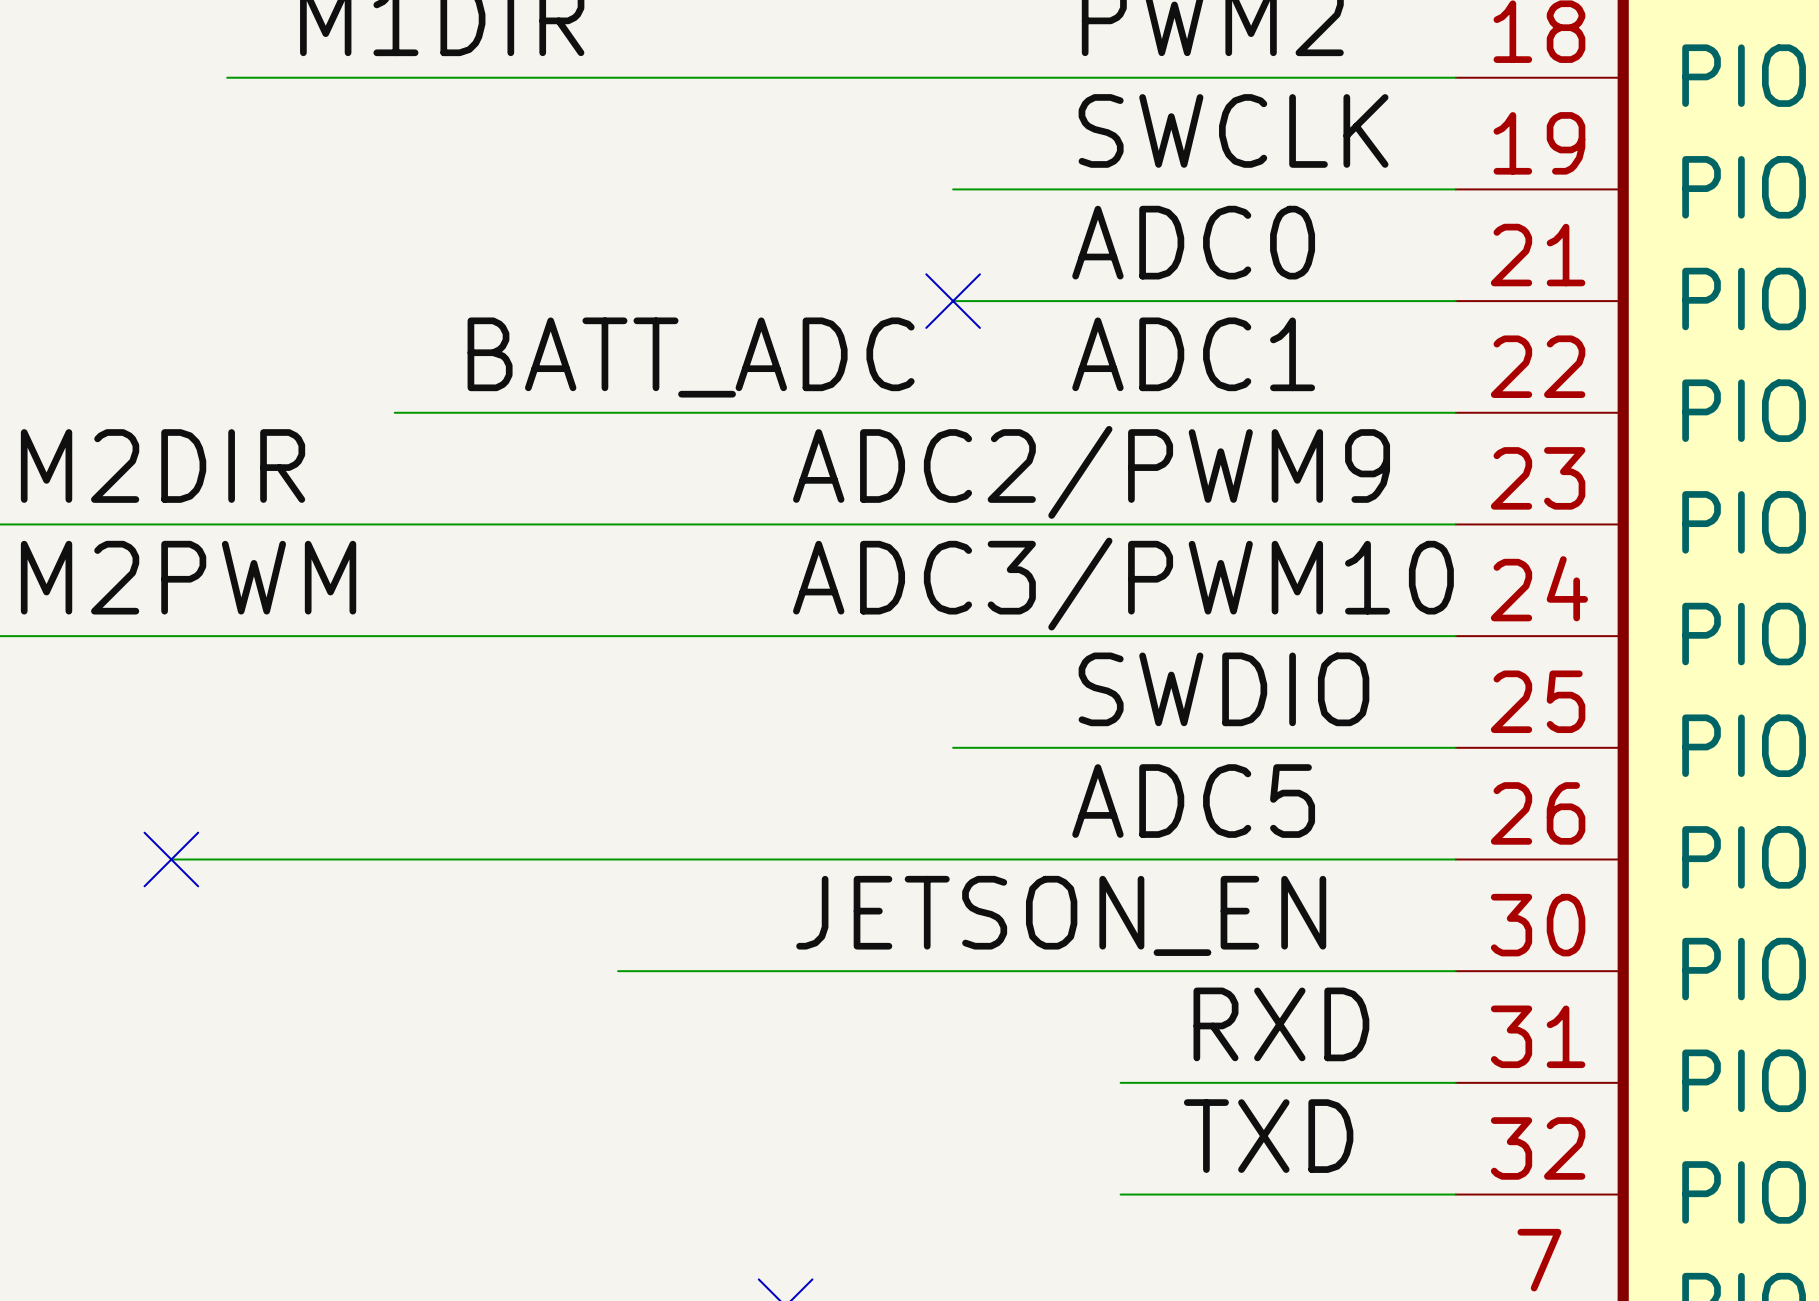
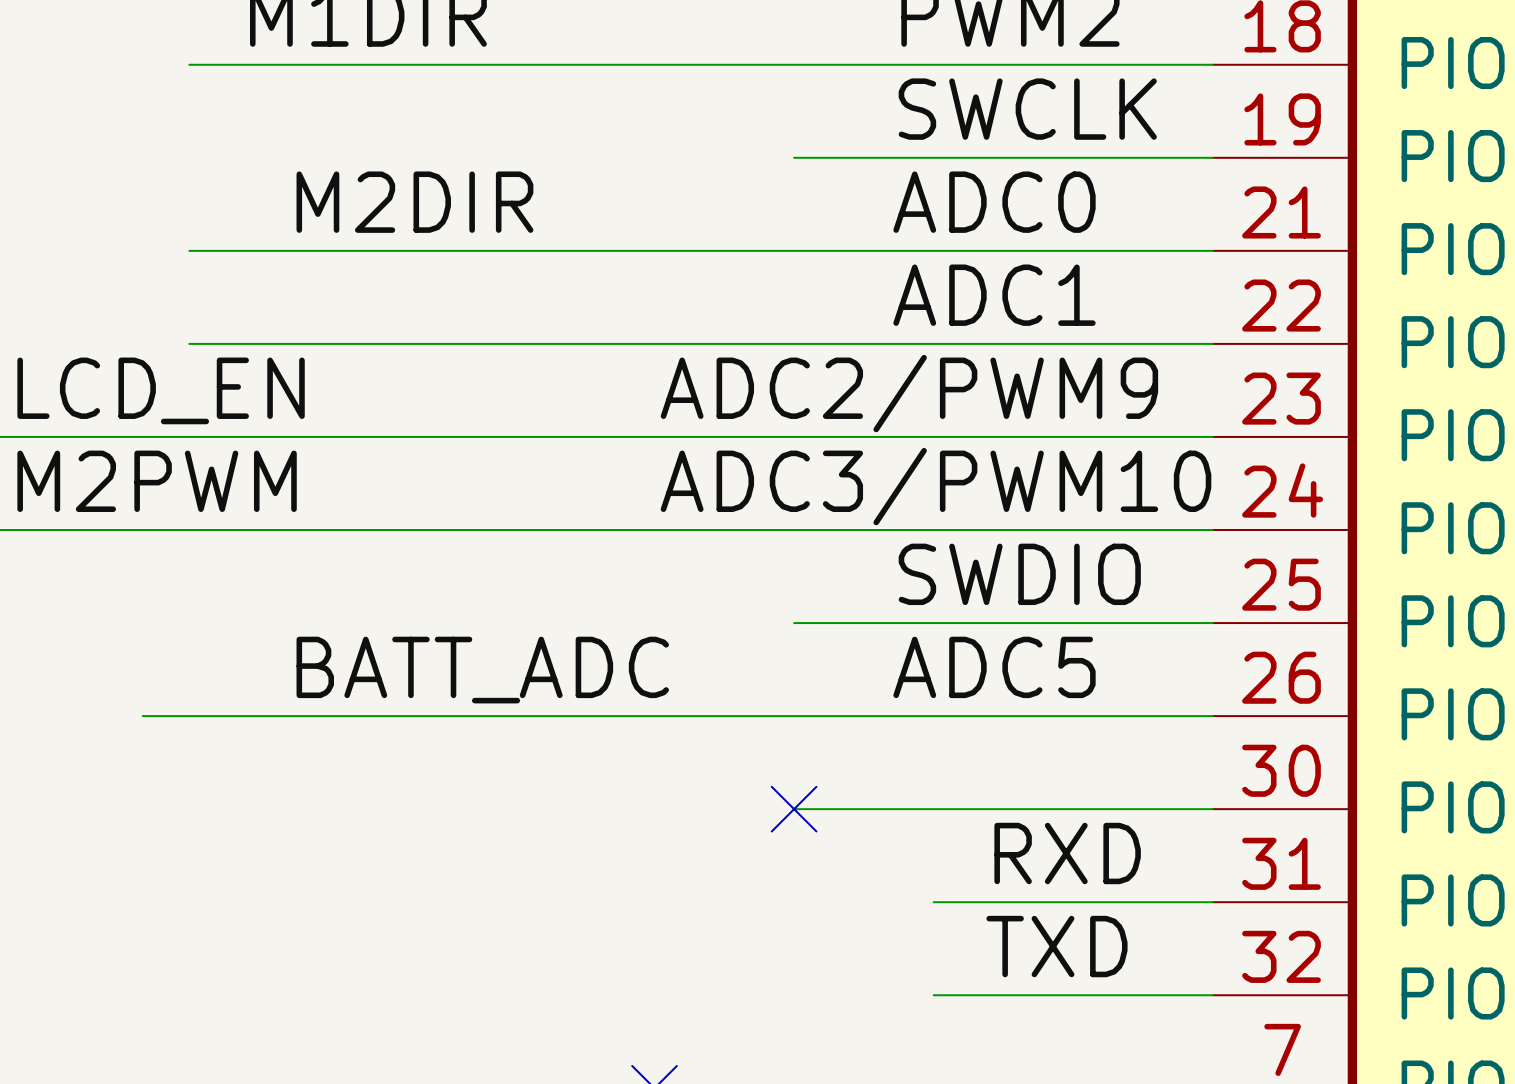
label: none -> M2DIR (414, 202)
wire: none -> (189, 250) (794, 250)
no-connect mark: (953, 301) -> none
label position: BATT_ADC (691, 357) -> BATT_ADC (482, 670)
wire: none -> (189, 343) (328, 343)
label: M2DIR (163, 466) -> LCD_EN (161, 390)
no-connect mark: (171, 859) -> none
label: JETSON_EN (1061, 915) -> none
wire: (618, 971) (953, 971) -> none
no-connect mark: none -> (794, 809)

